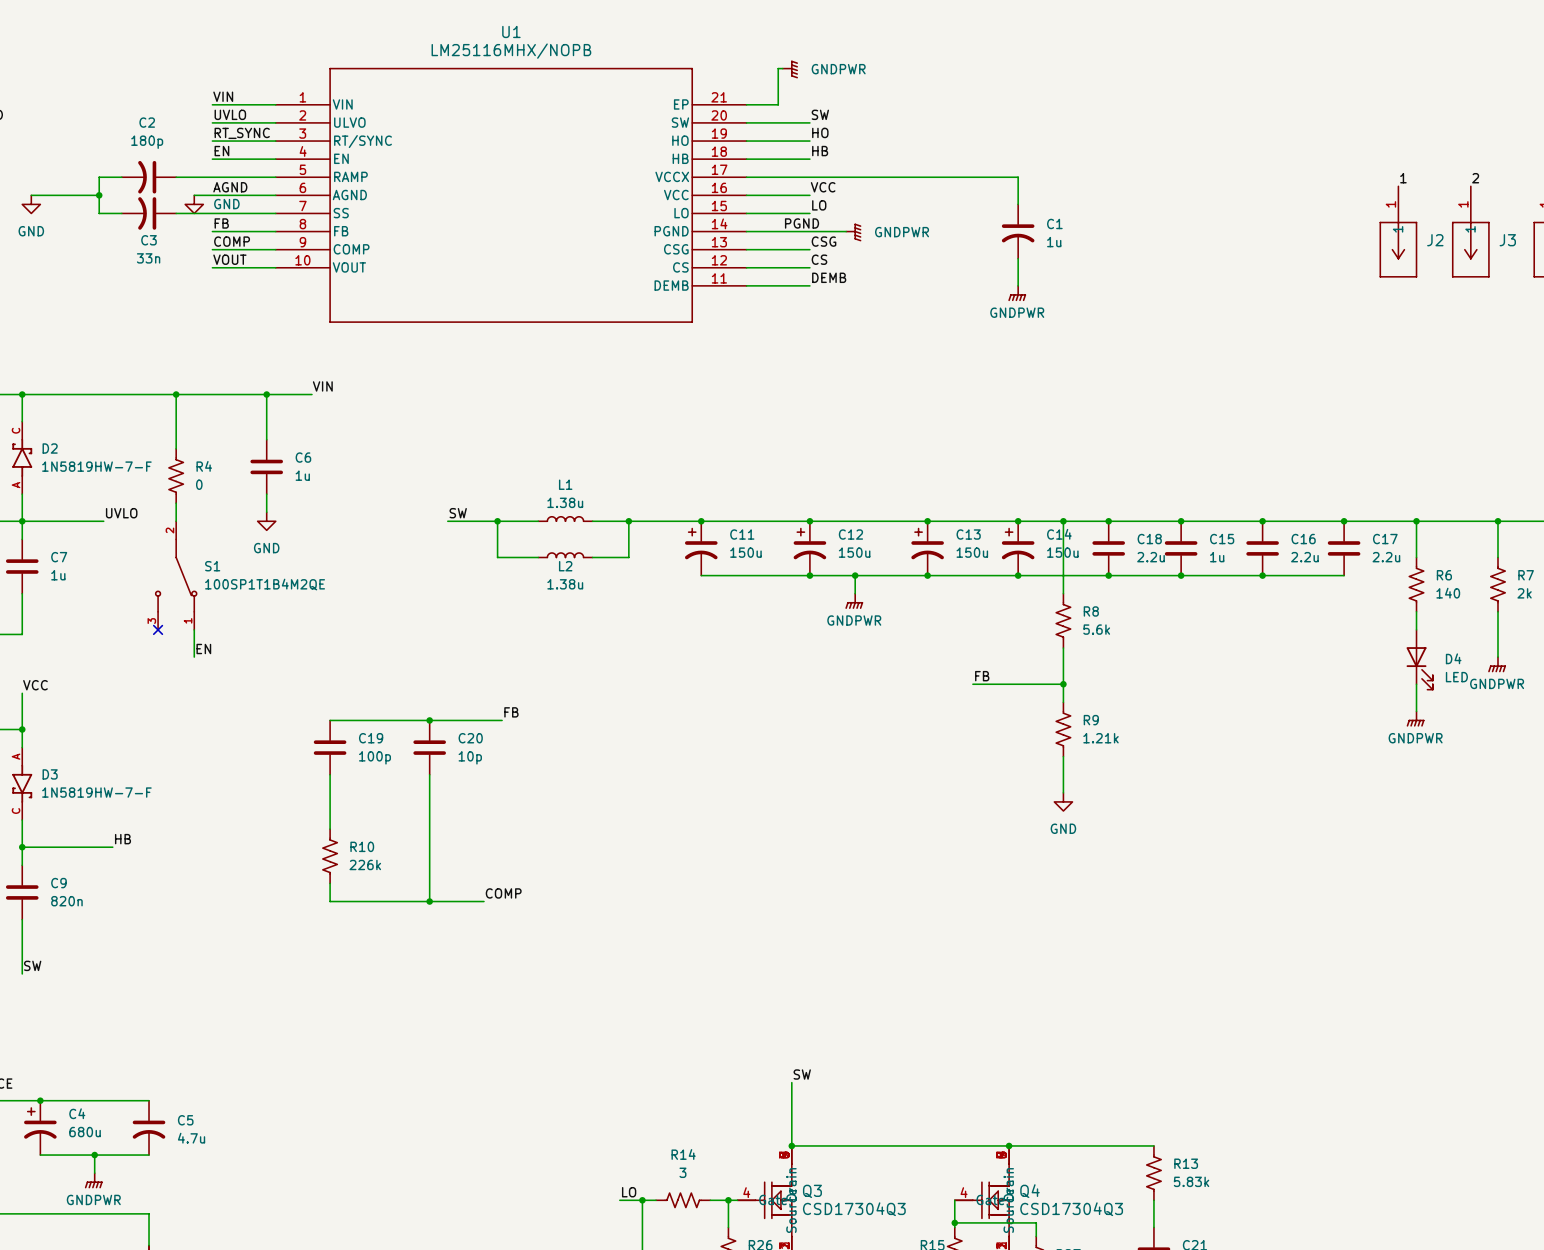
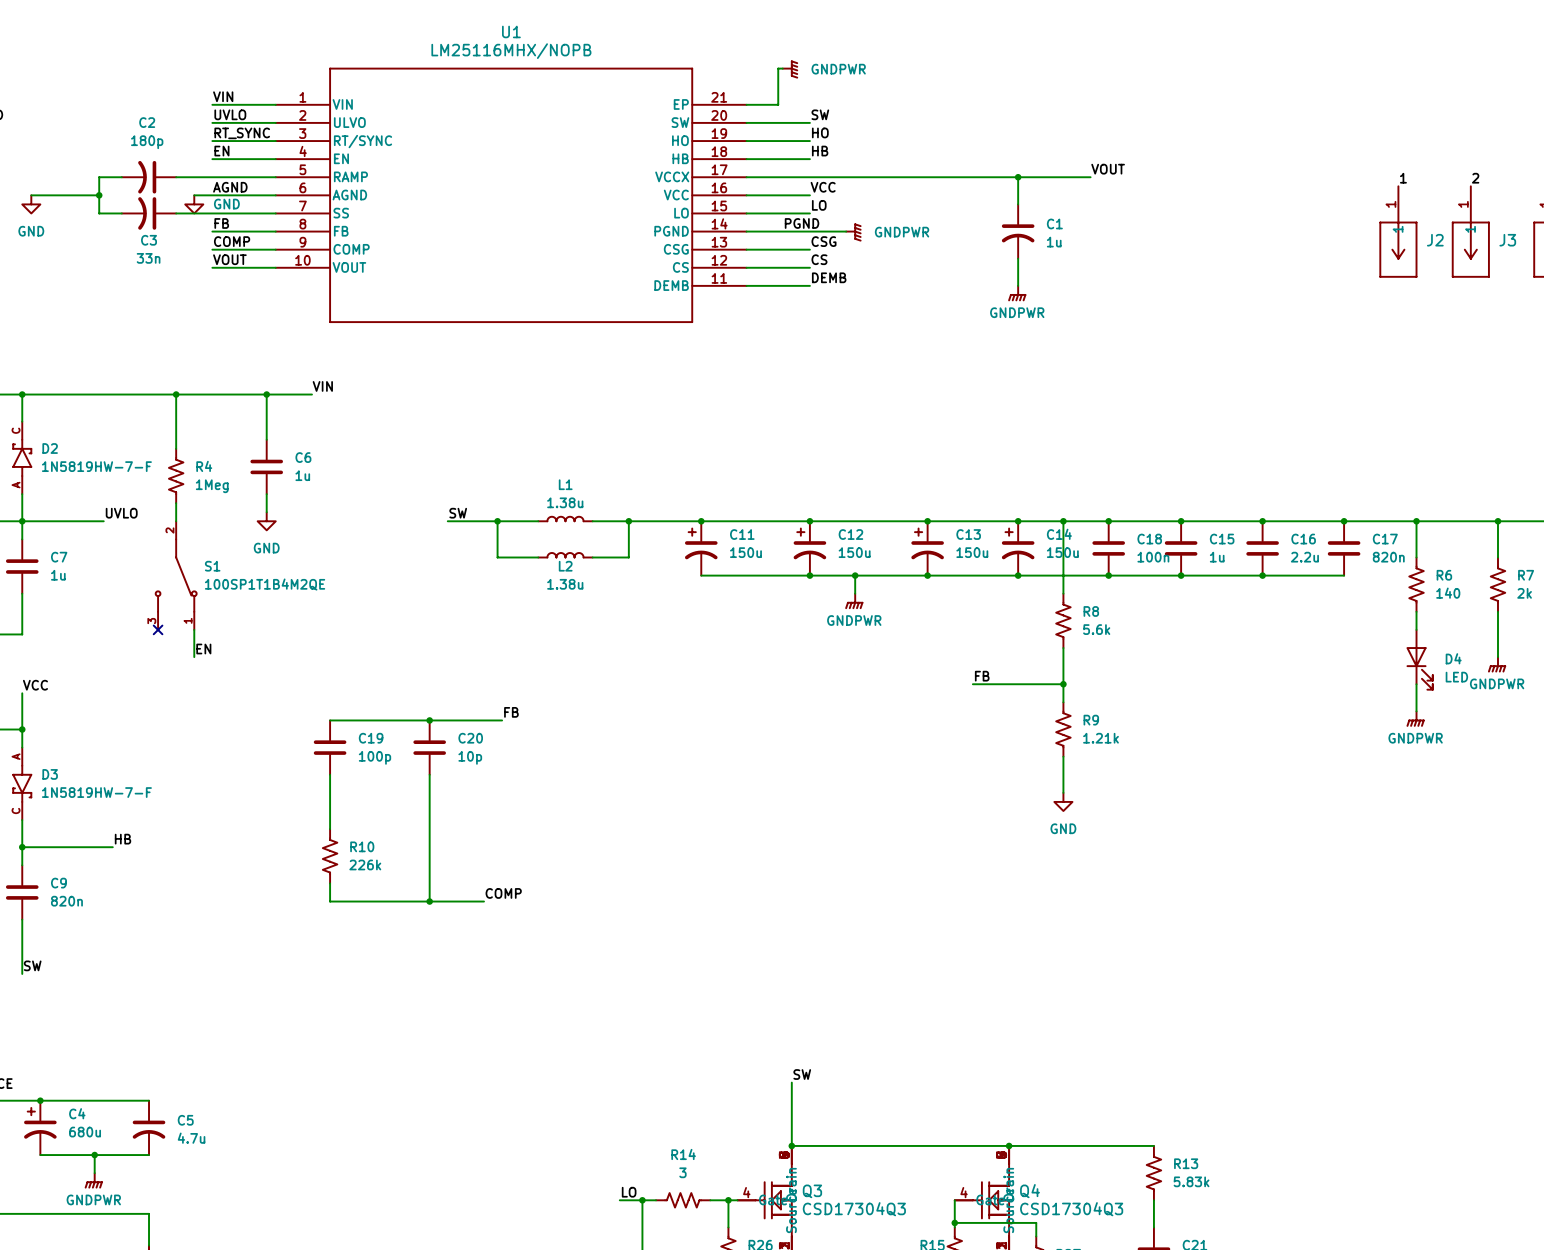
label: none -> VOUT (1108, 169)
wire: none -> (1018, 177) (1090, 177)
junction: none -> (1018, 177)
R4 value: 0 (199, 484) -> 1Meg (212, 486)
C18 value: 2.2u (1151, 557) -> 100n (1153, 557)
C17 value: 2.2u (1386, 557) -> 820n (1388, 557)

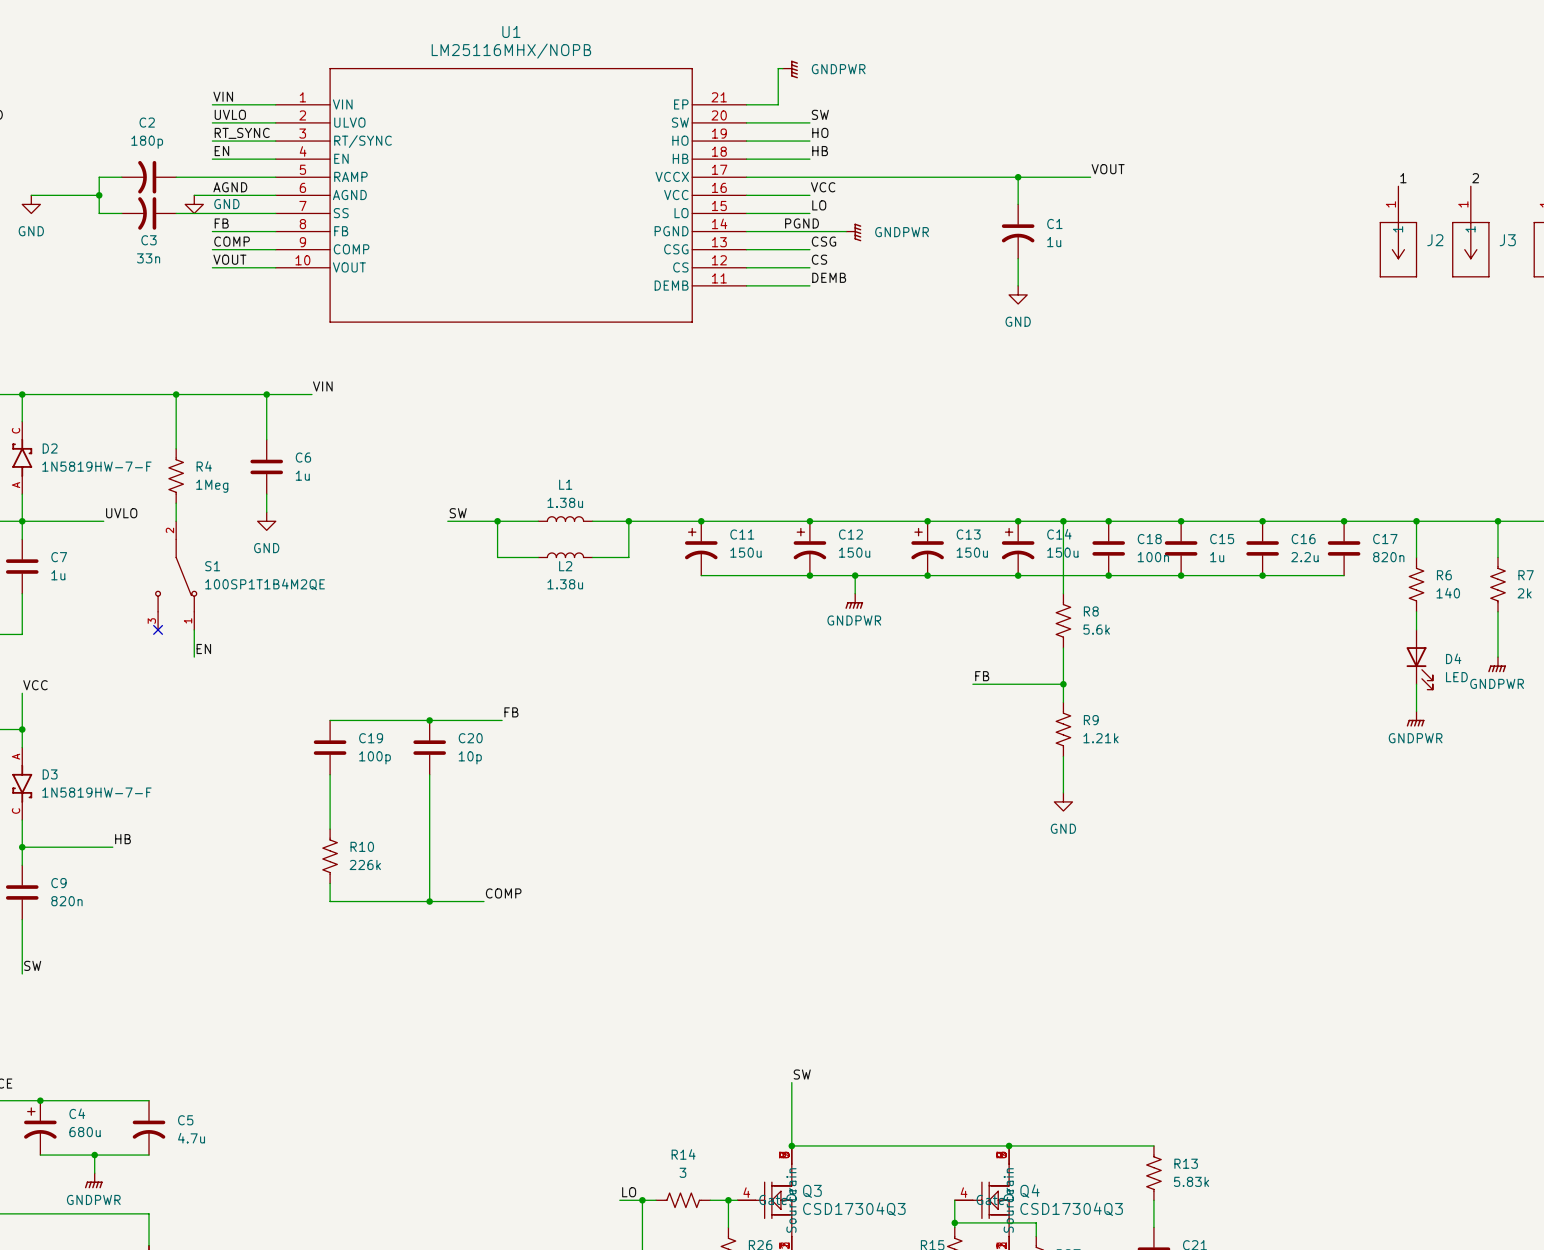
power symbol: GNDPWR (1017, 293) -> GND (1018, 294)

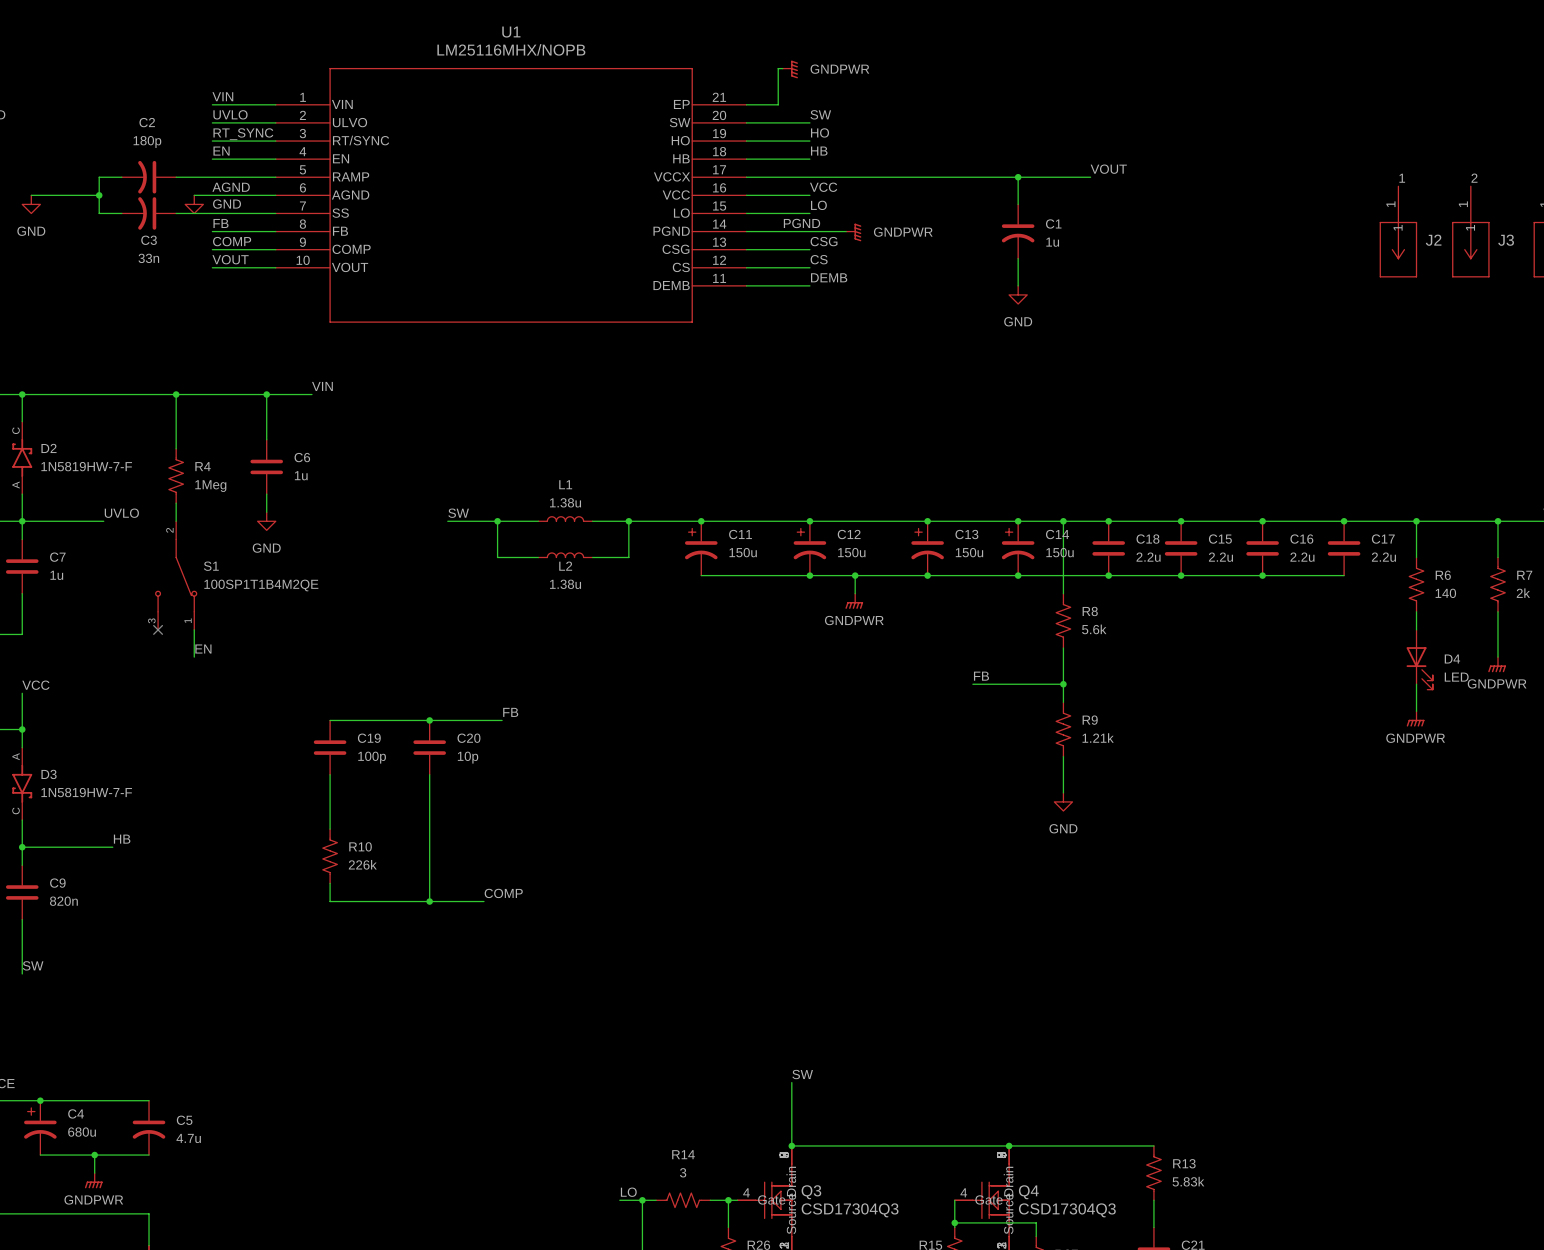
C18 value: 100n (1153, 557) -> 2.2u (1148, 557)
C15 value: 1u (1217, 557) -> 2.2u (1220, 557)
C17 value: 820n (1388, 557) -> 2.2u (1383, 557)

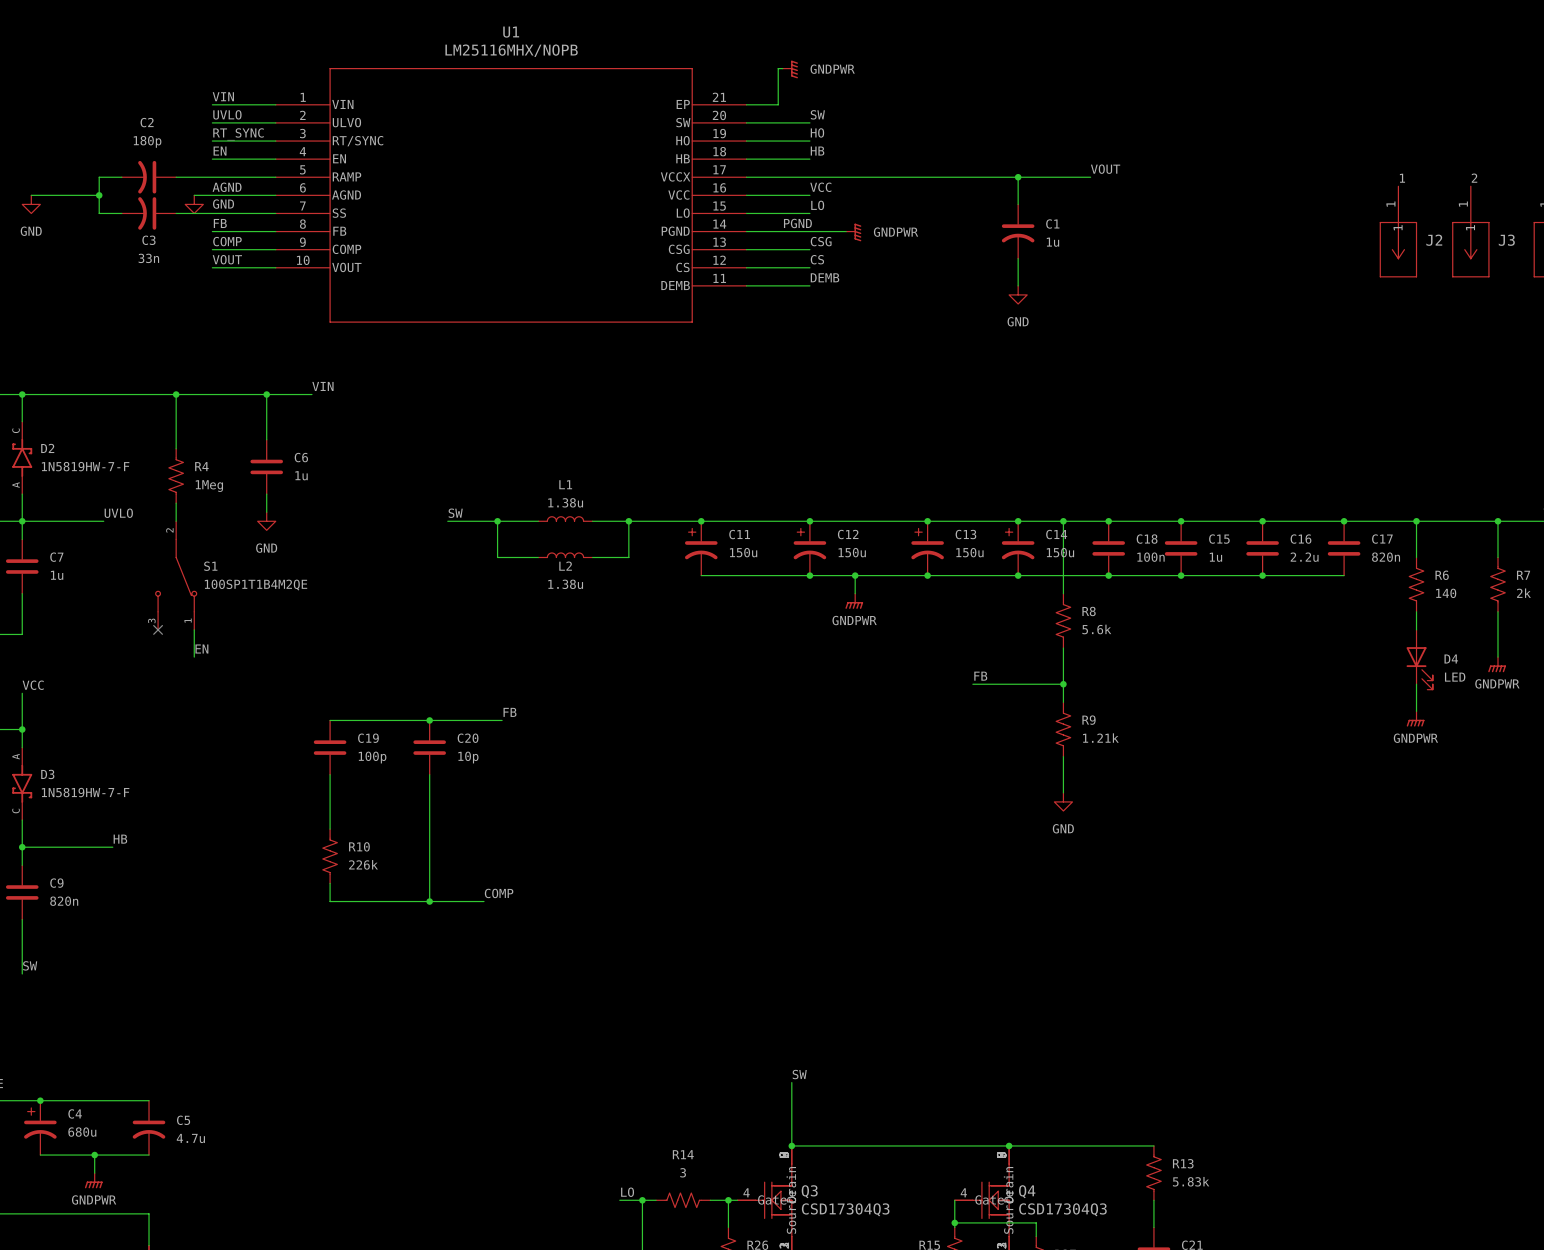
C18 value: 2.2u (1148, 557) -> 100n (1151, 557)
C15 value: 2.2u (1220, 557) -> 1u (1215, 557)
C17 value: 2.2u (1383, 557) -> 820n (1386, 557)

